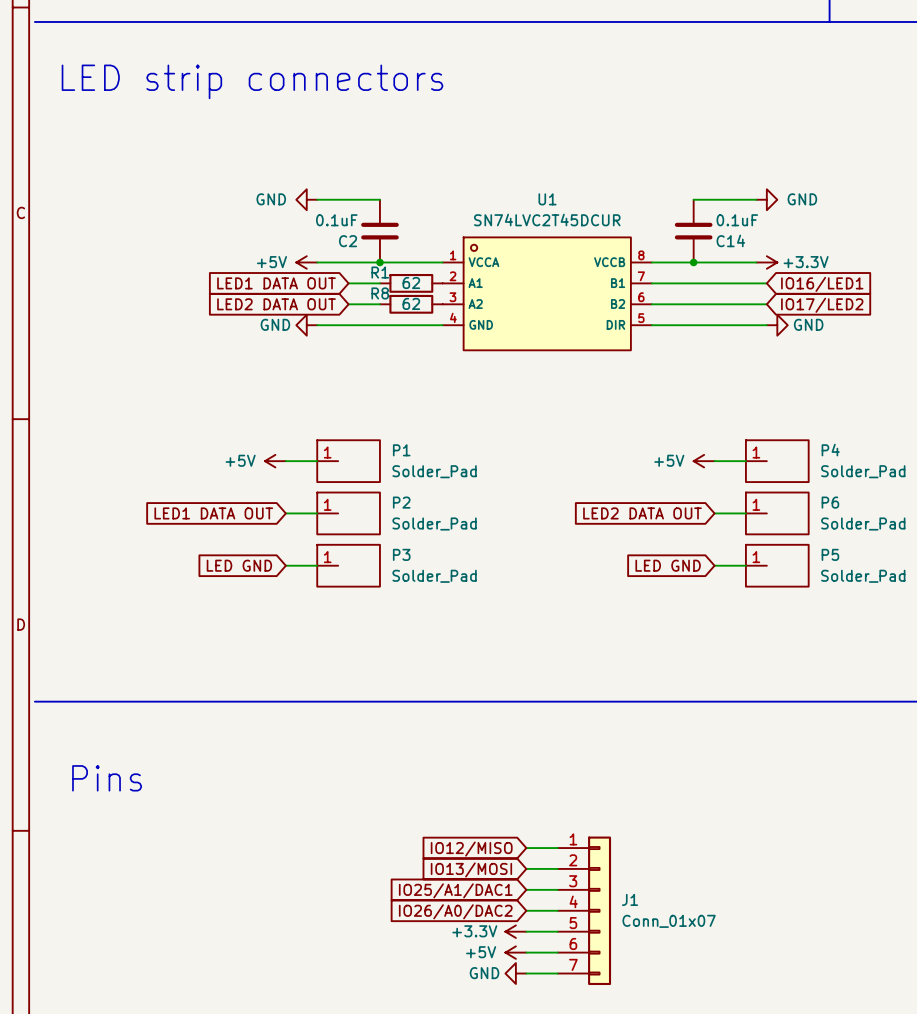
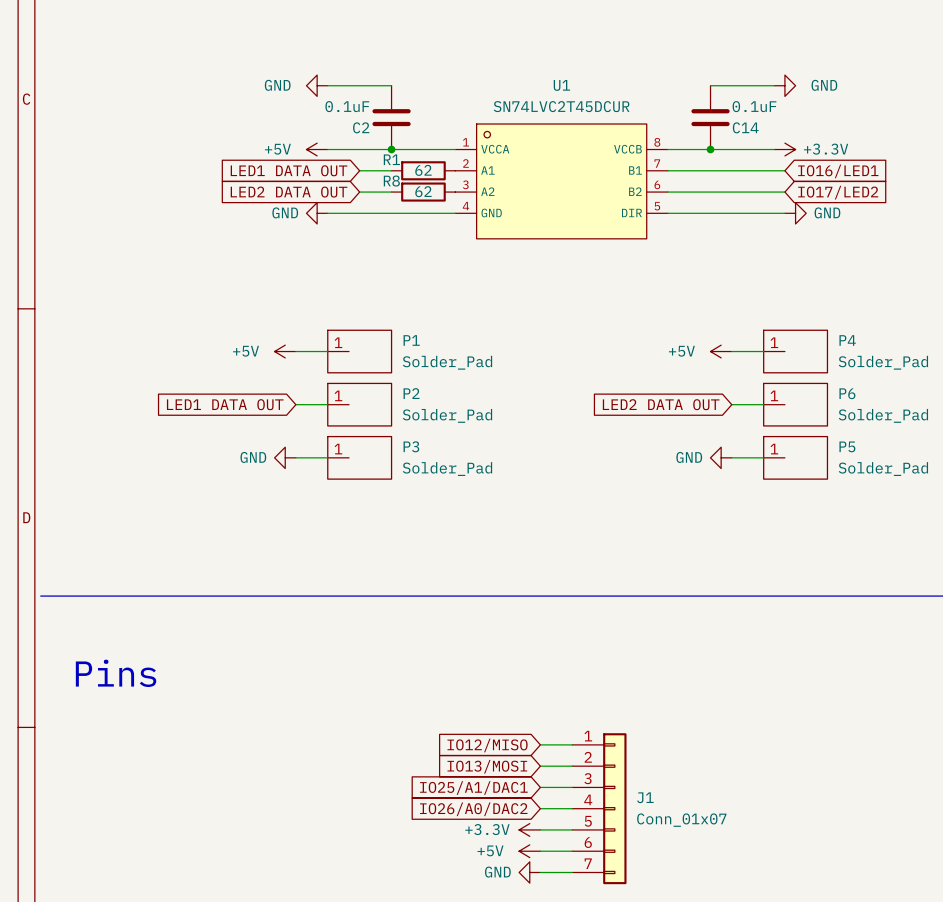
global label: LED GND (239, 565) -> none
power symbol: none -> GND (285, 457)
global label: LED GND (668, 565) -> none
power symbol: none -> GND (721, 457)

